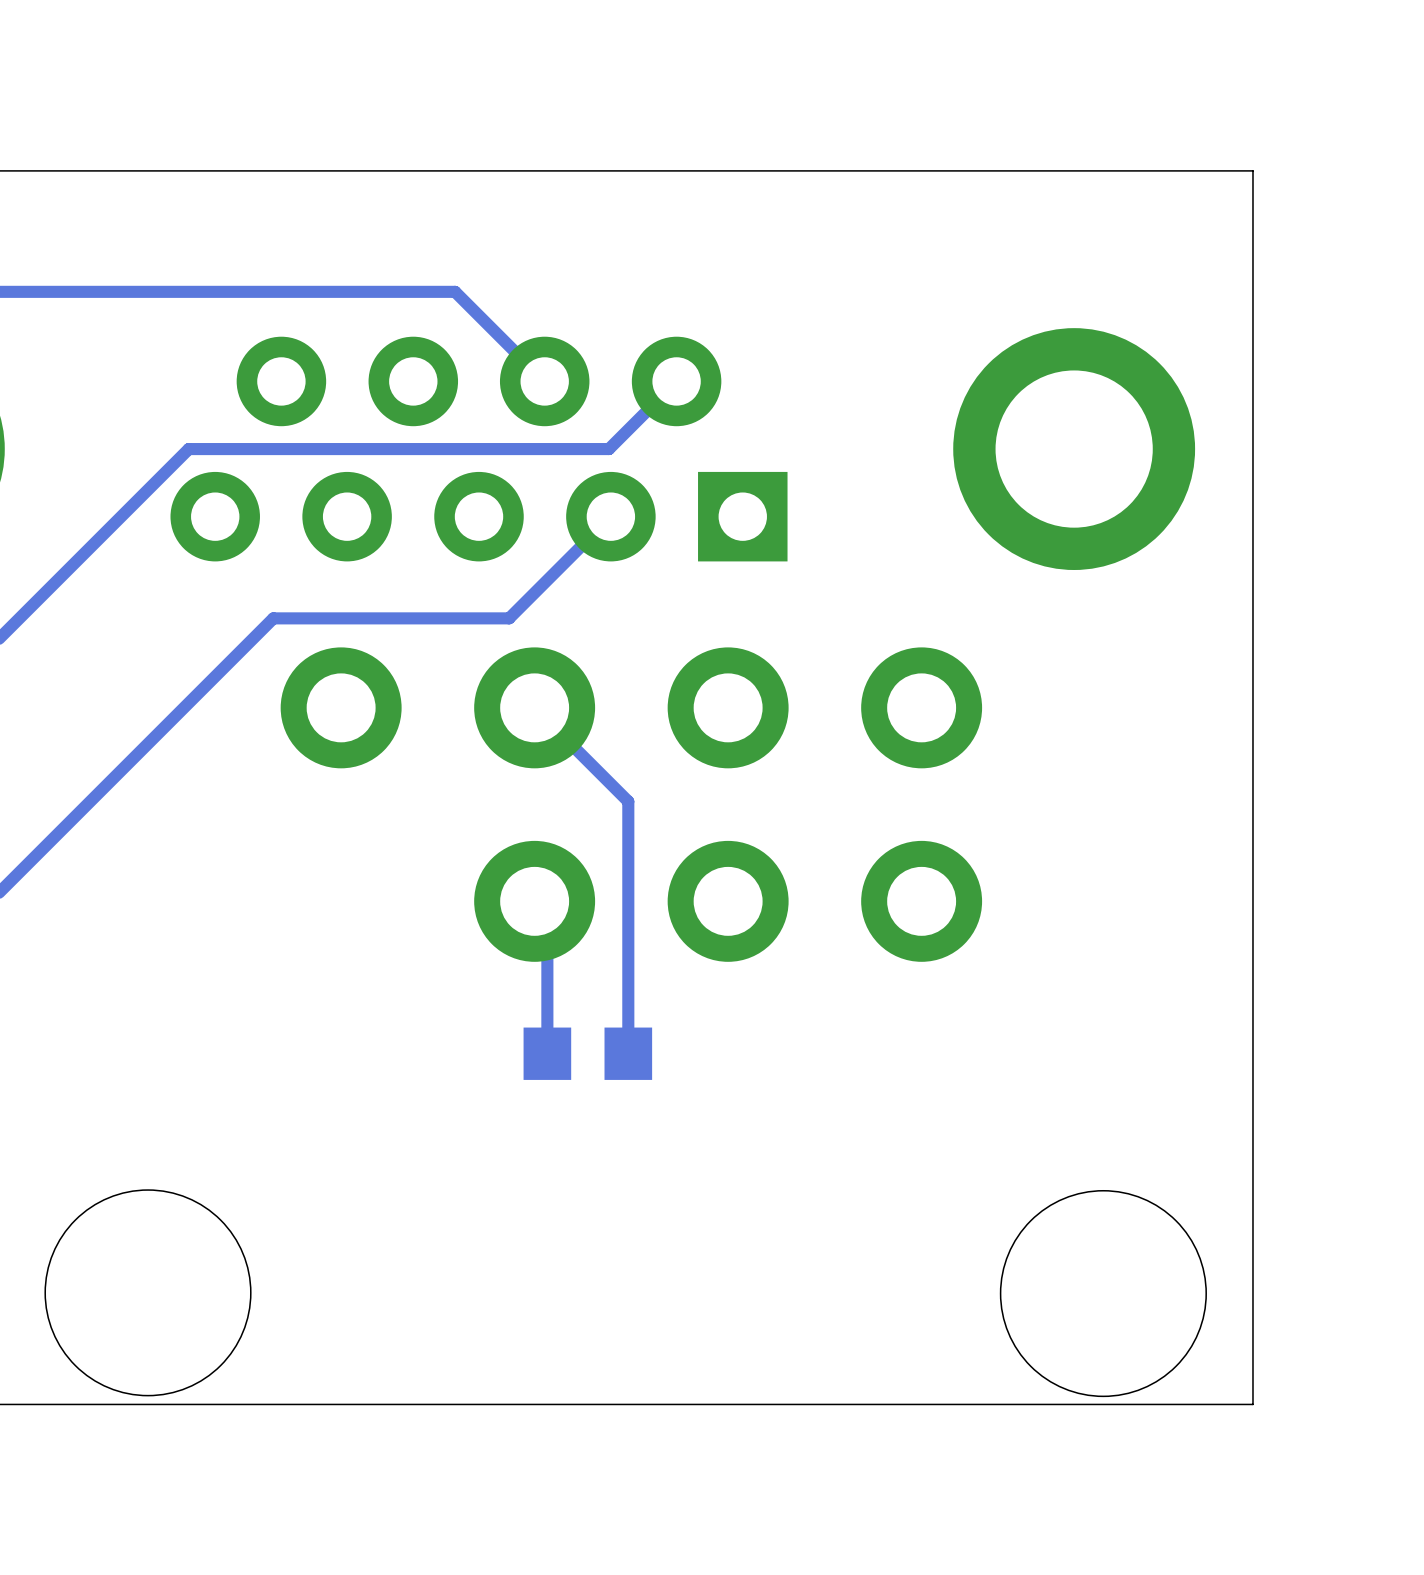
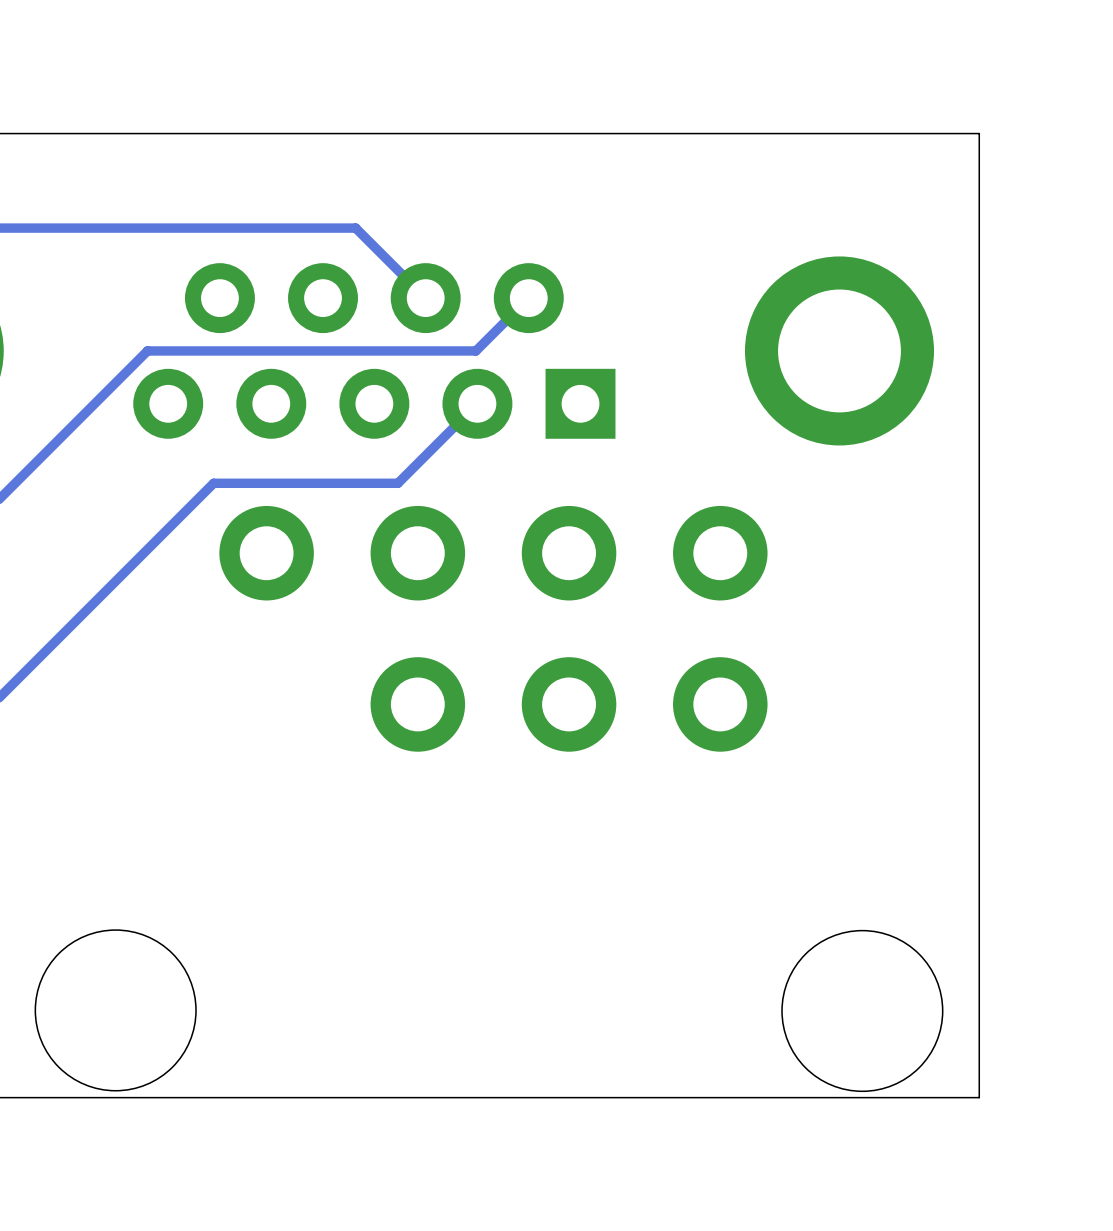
track: (534, 707) (628, 801) (628, 1053) -> none
track: (534, 901) (547, 914) (547, 1053) -> none
part: (587, 1053) -> none

